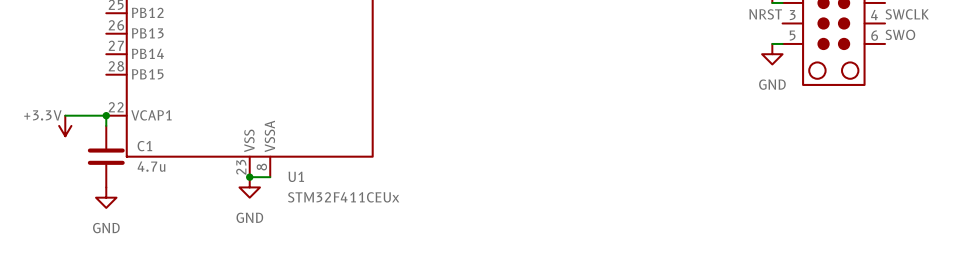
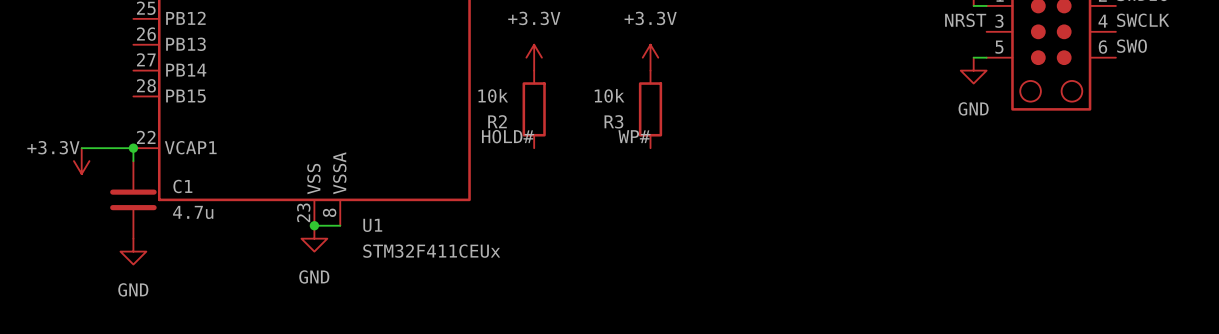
power symbol: none -> +3.3V (534, 57)
power symbol: none -> +3.3V (650, 57)
R2: none -> 10k (534, 109)
R3: none -> 10k (650, 109)
label: none -> HOLD# (508, 136)
label: none -> WP# (634, 136)

